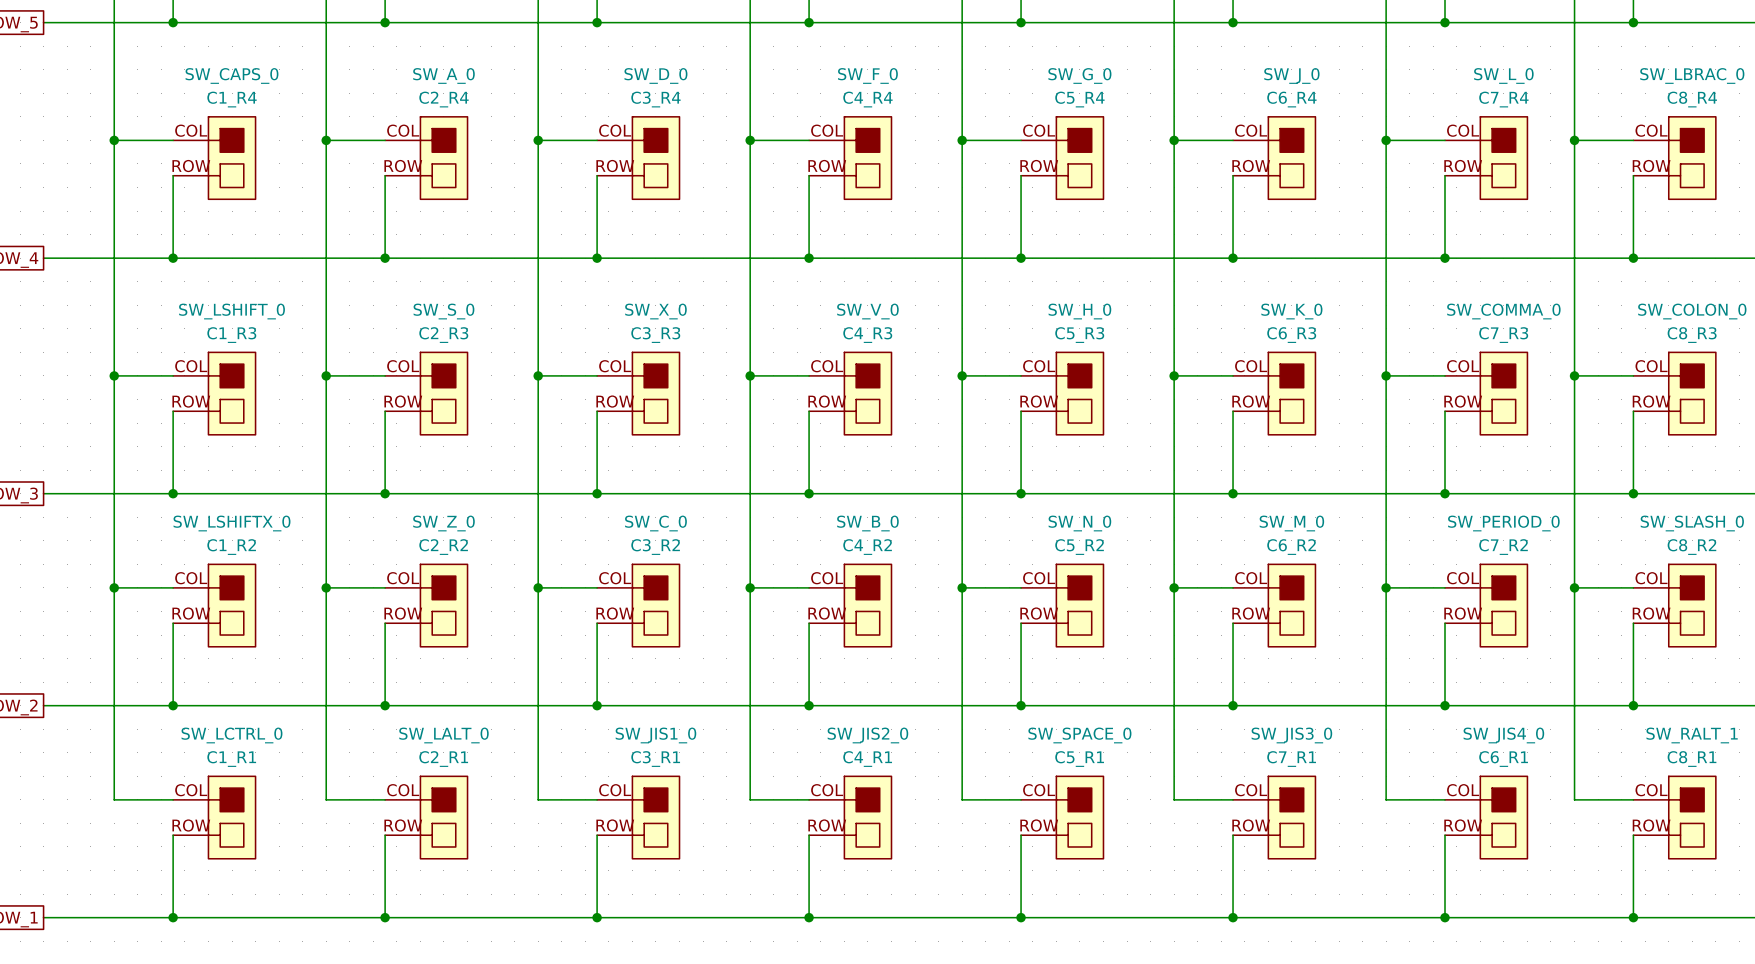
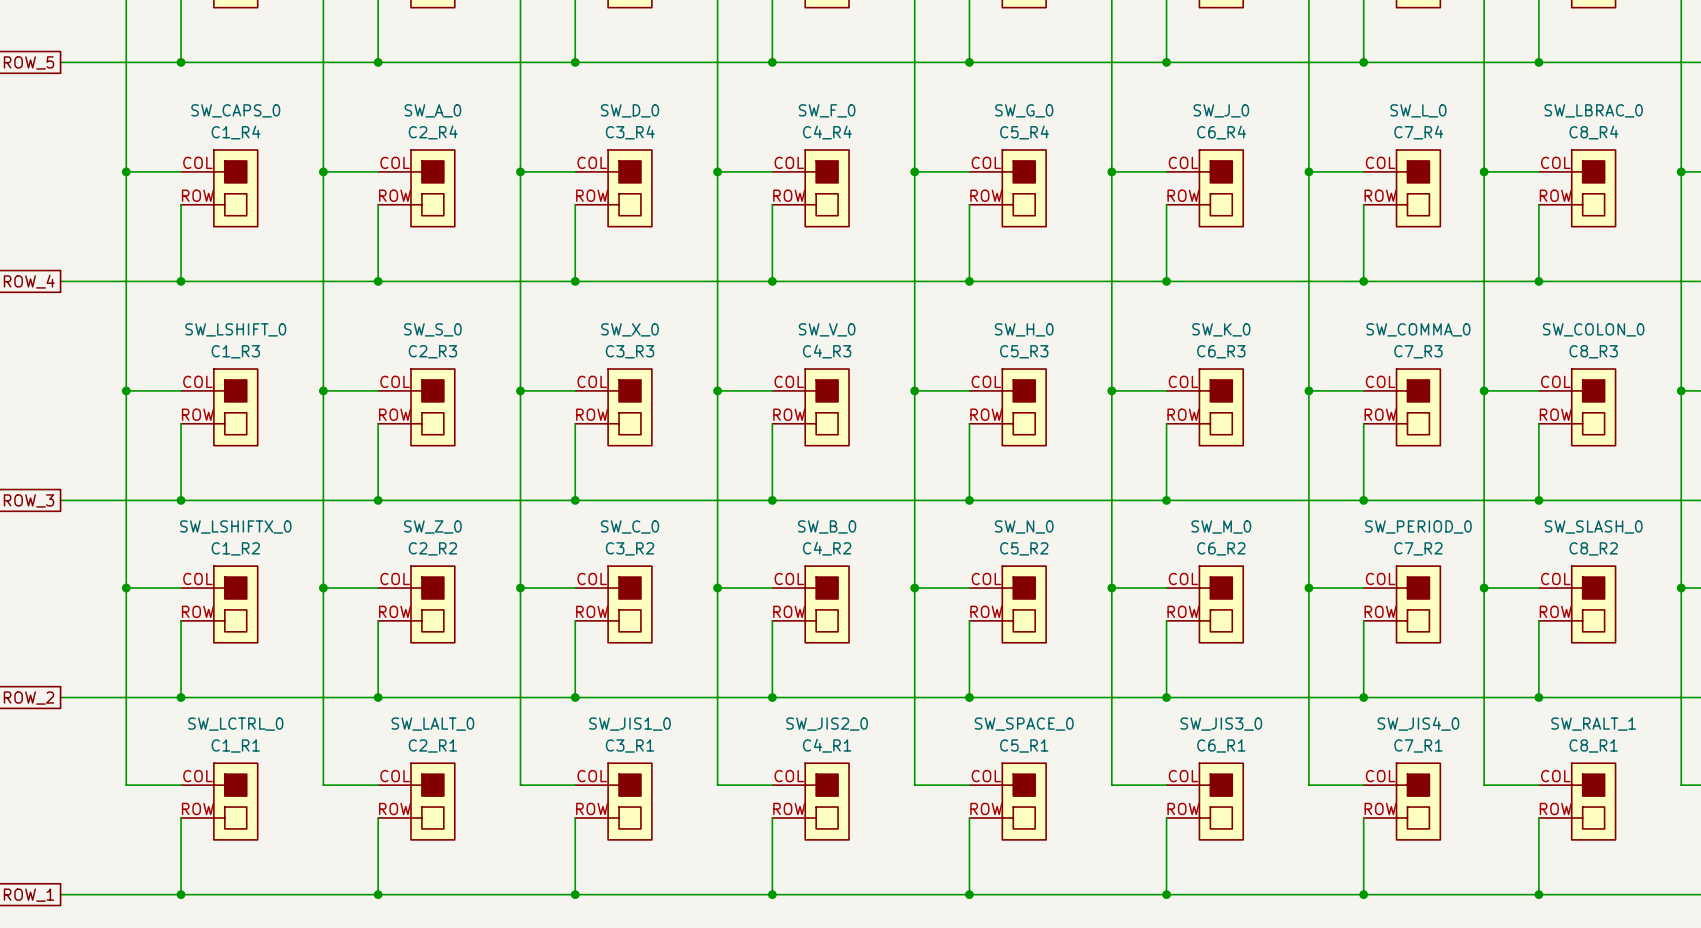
SW_JIS3_0 value: C7_R1 (1291, 759) -> C6_R1 (1221, 745)
SW_JIS4_0 value: C6_R1 (1503, 759) -> C7_R1 (1418, 745)

